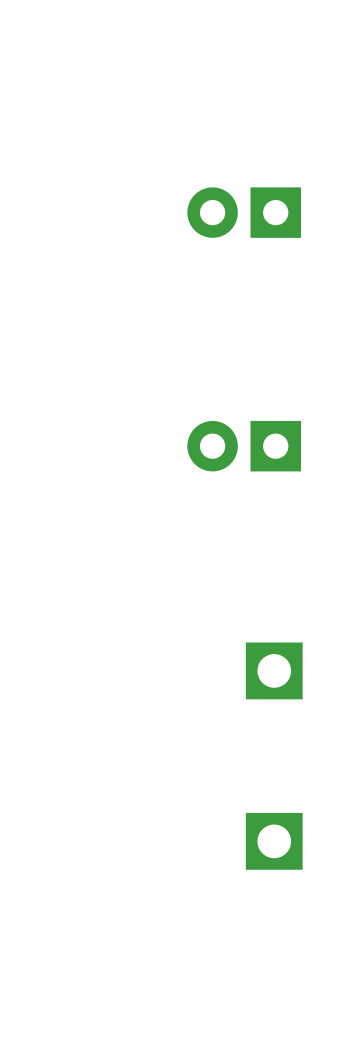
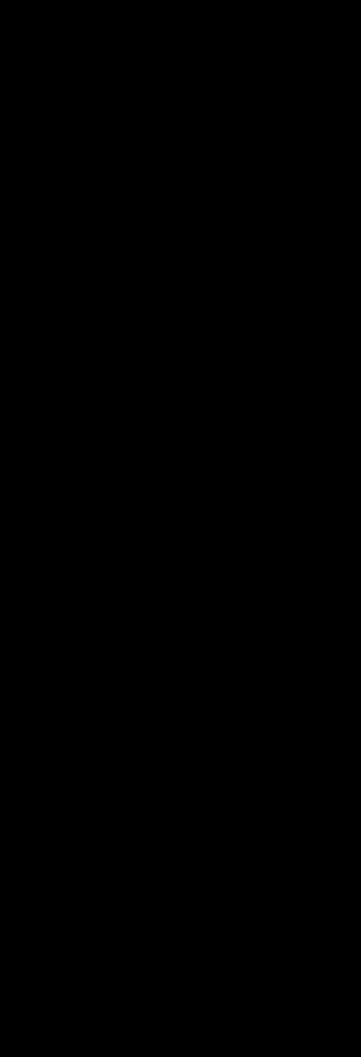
part: (244, 212) -> none
part: (244, 446) -> none
part: (274, 670) -> none
part: (274, 841) -> none

